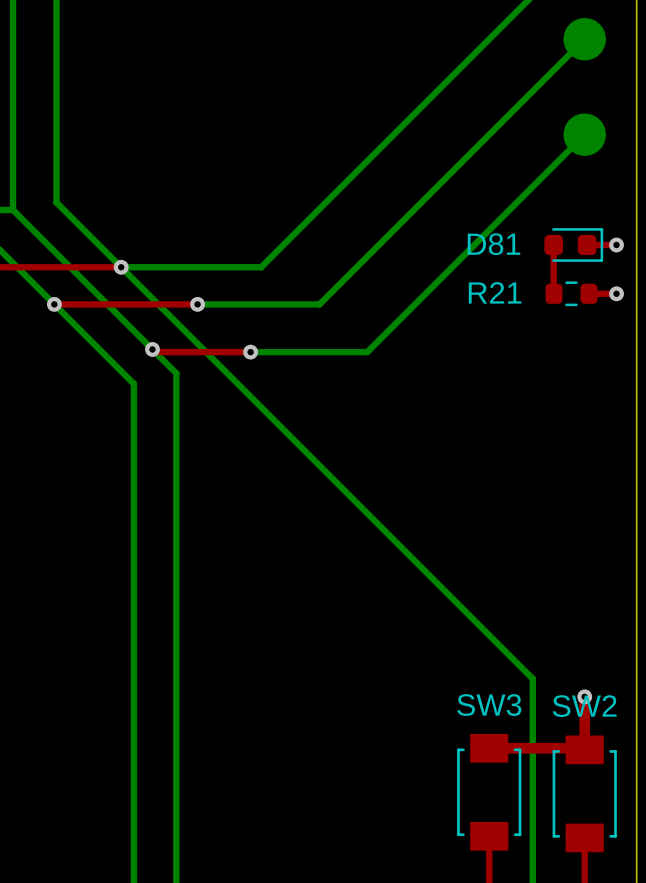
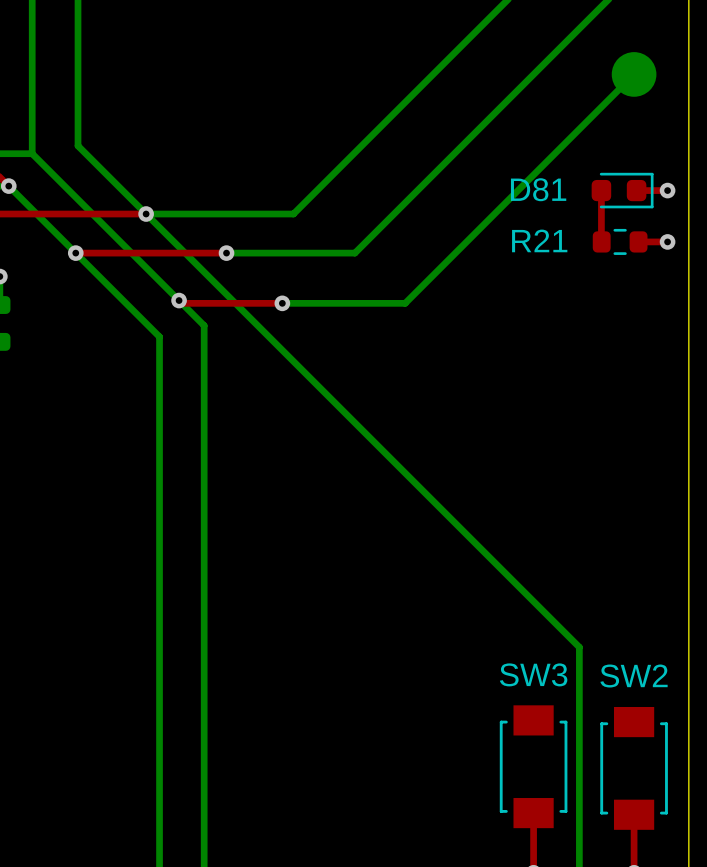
top track: (584, 696) (584, 749) (583, 748) (489, 748) -> none
via: (584, 696) -> none

